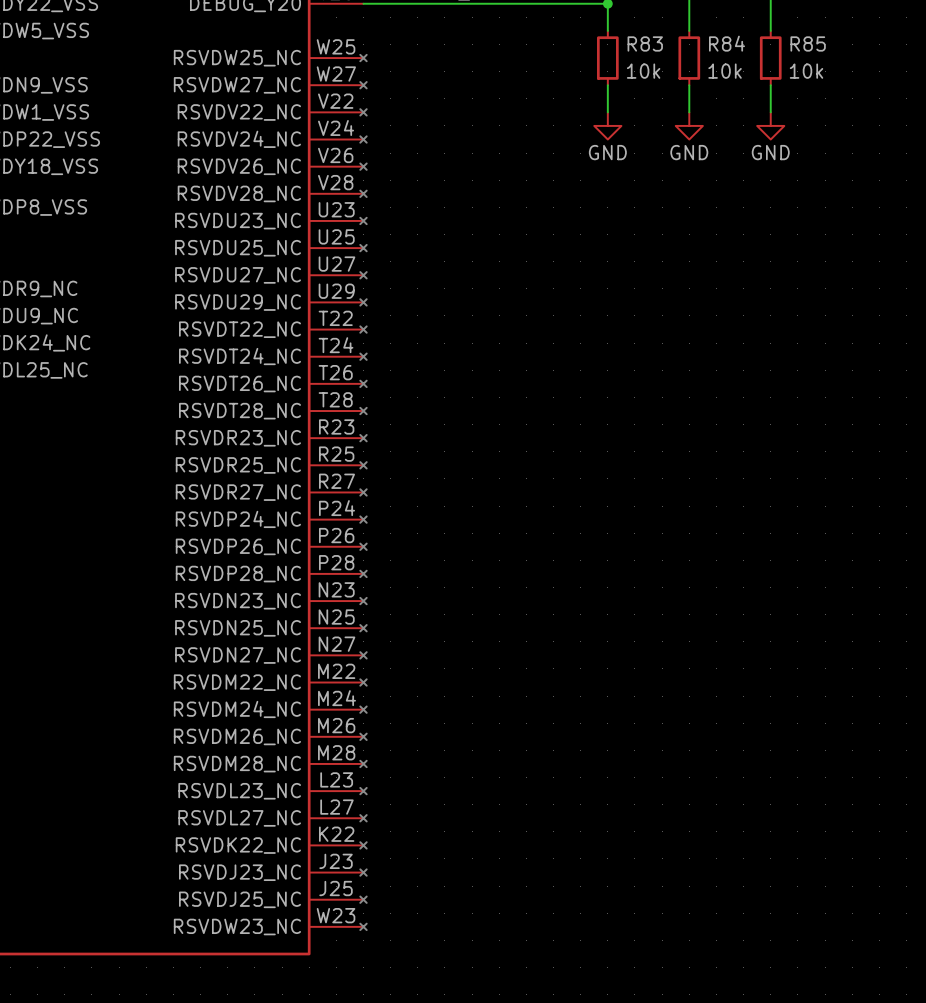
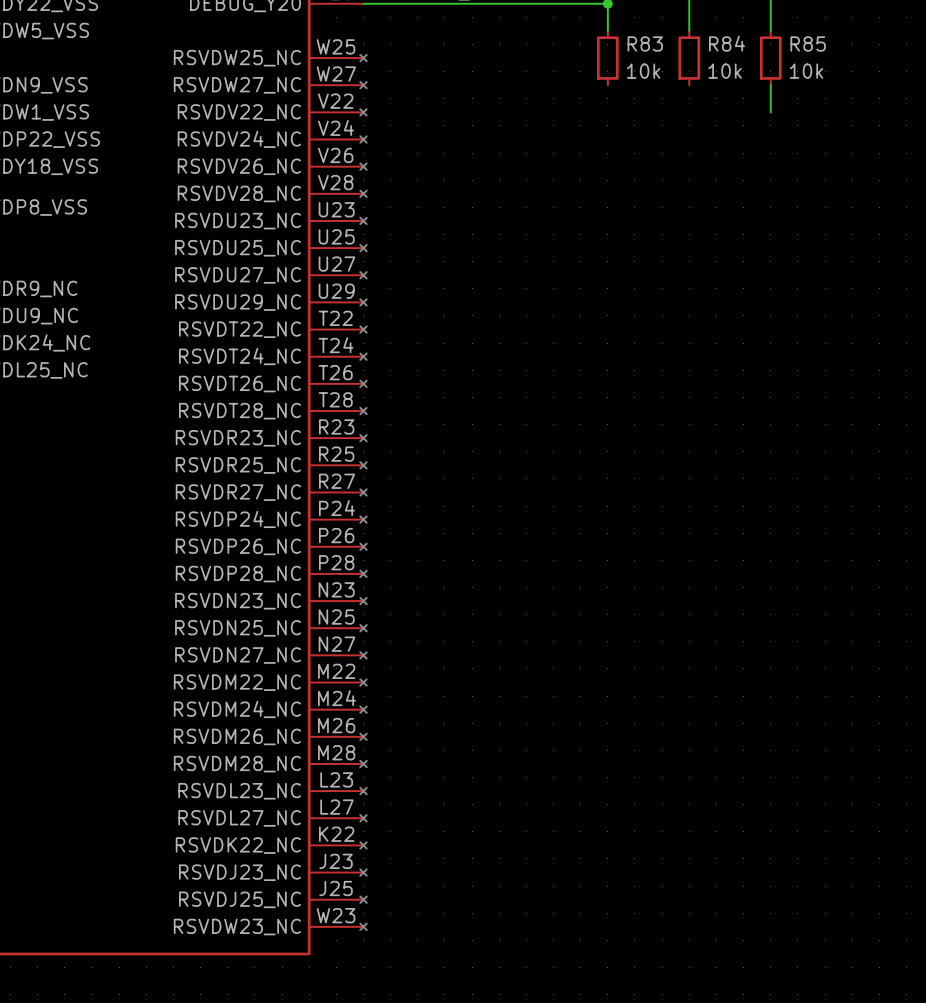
wire: (607, 85) (607, 112) -> none
wire: (689, 85) (689, 112) -> none
power symbol: GND (607, 125) -> none
power symbol: GND (689, 125) -> none
power symbol: GND (770, 125) -> none

